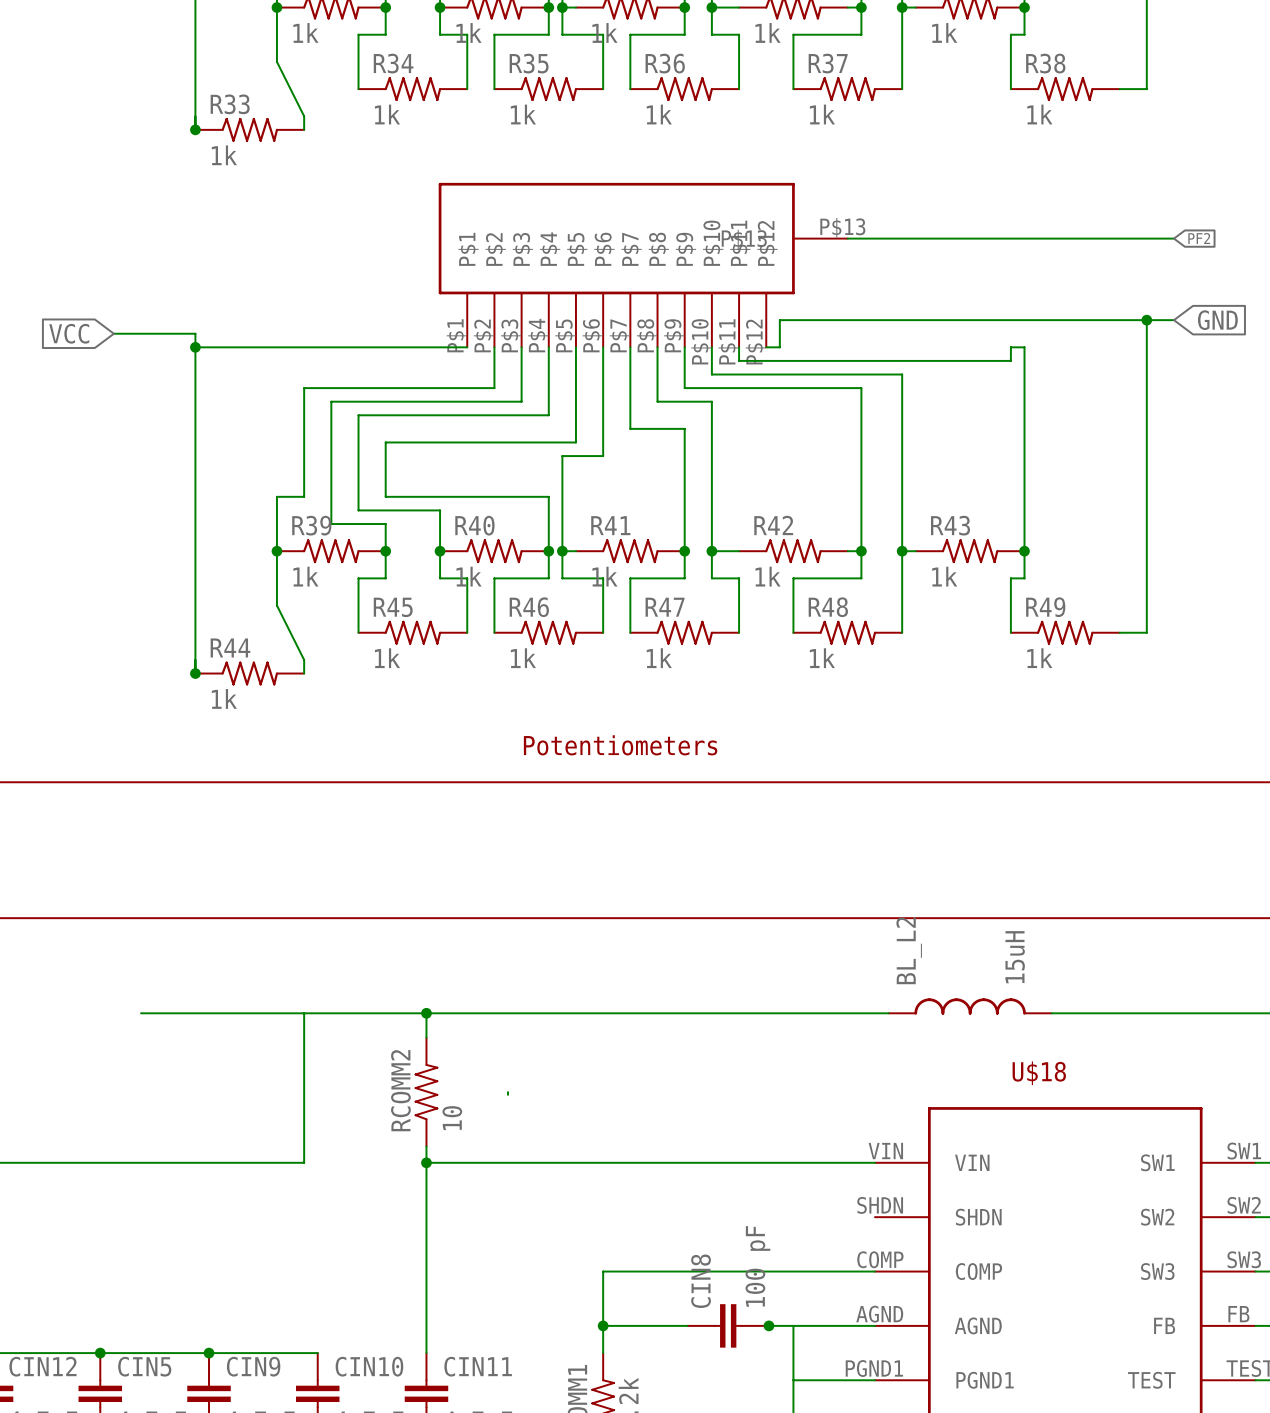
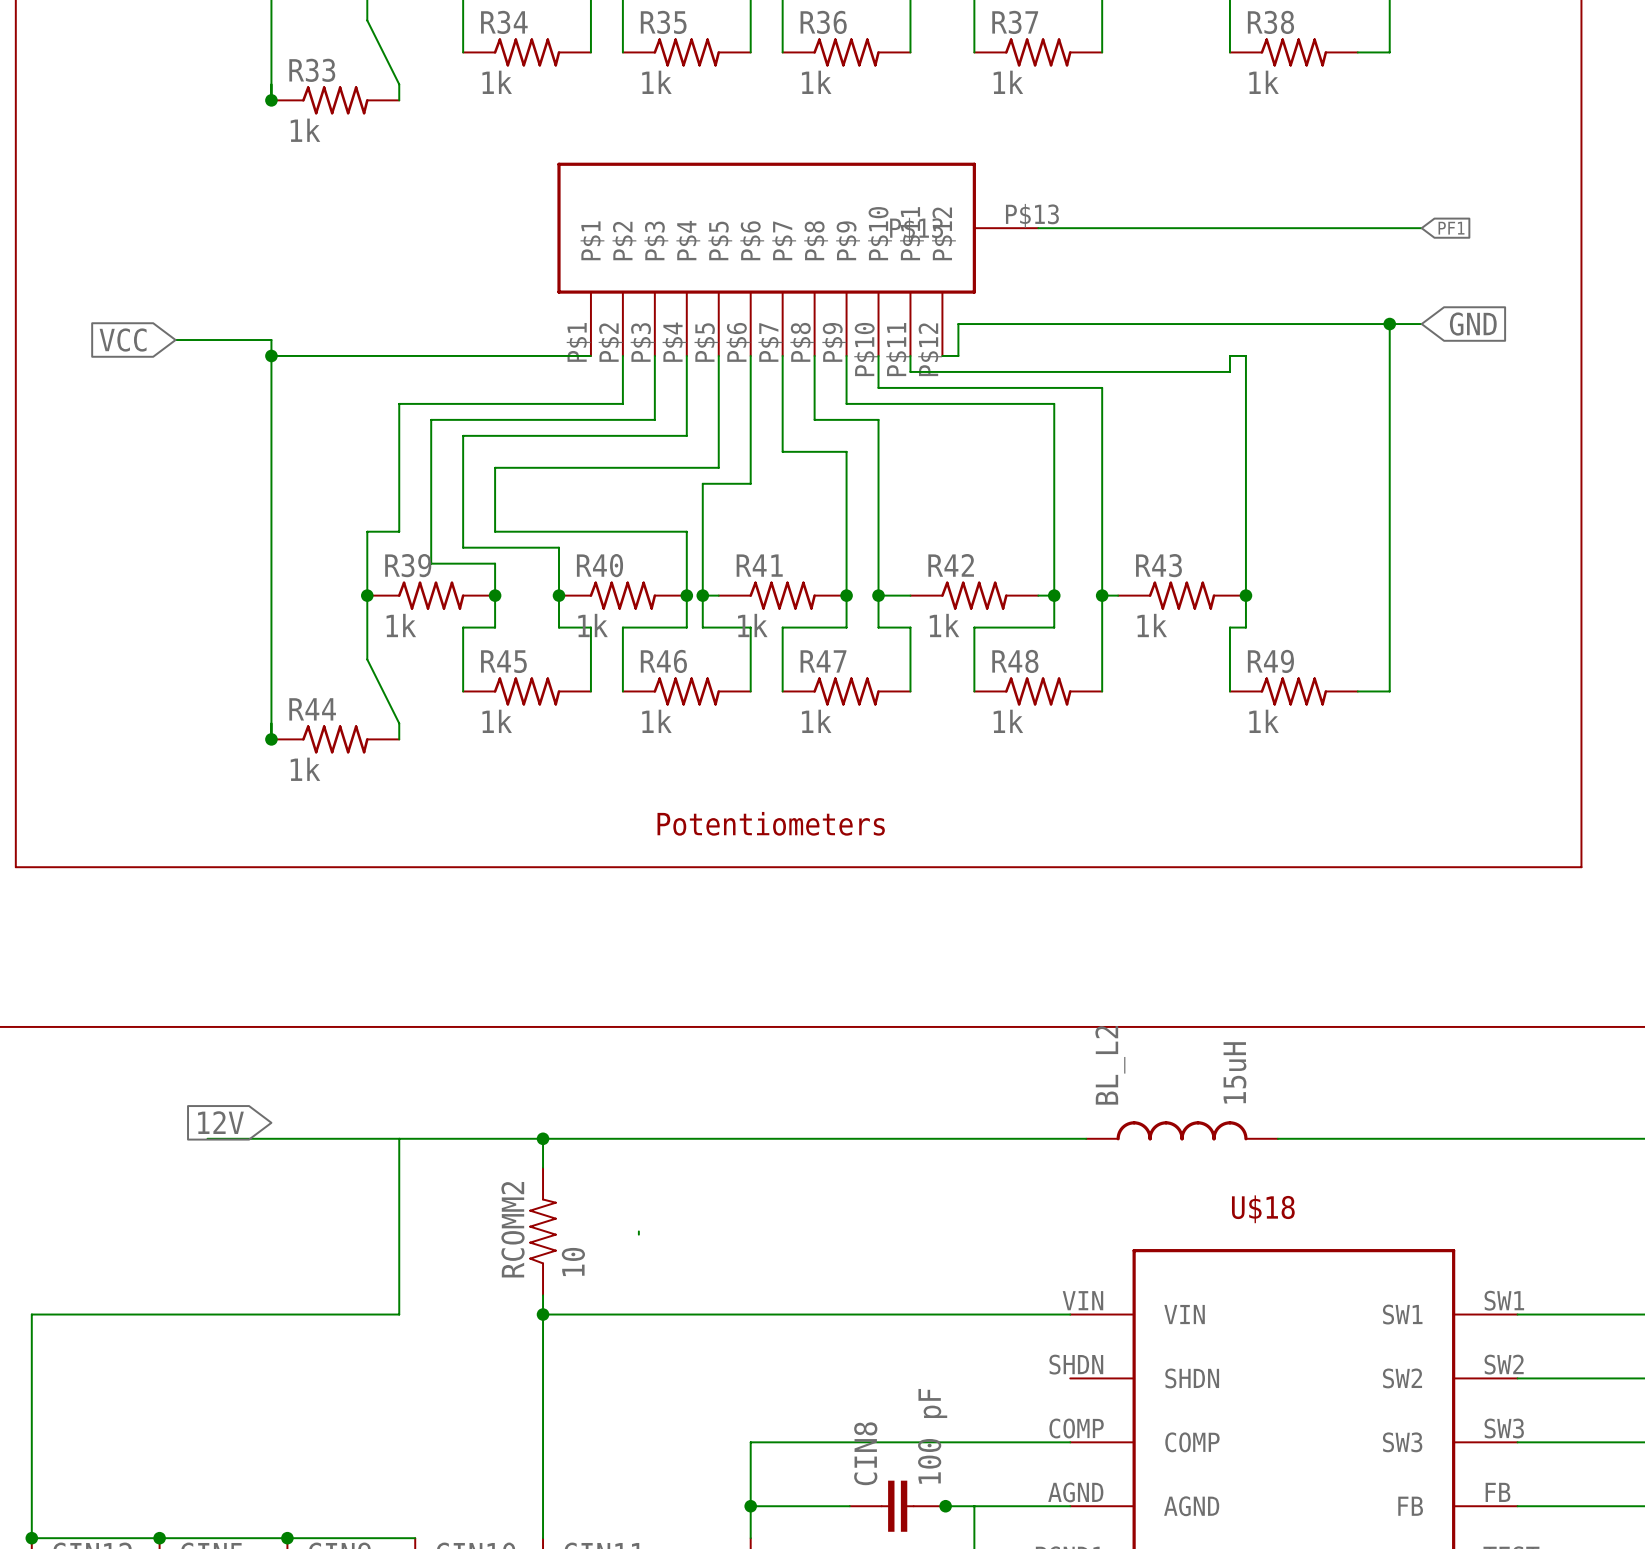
global label: PF2 (1199, 238) -> PF1 (1451, 228)
global label: none -> 12V (220, 1122)

